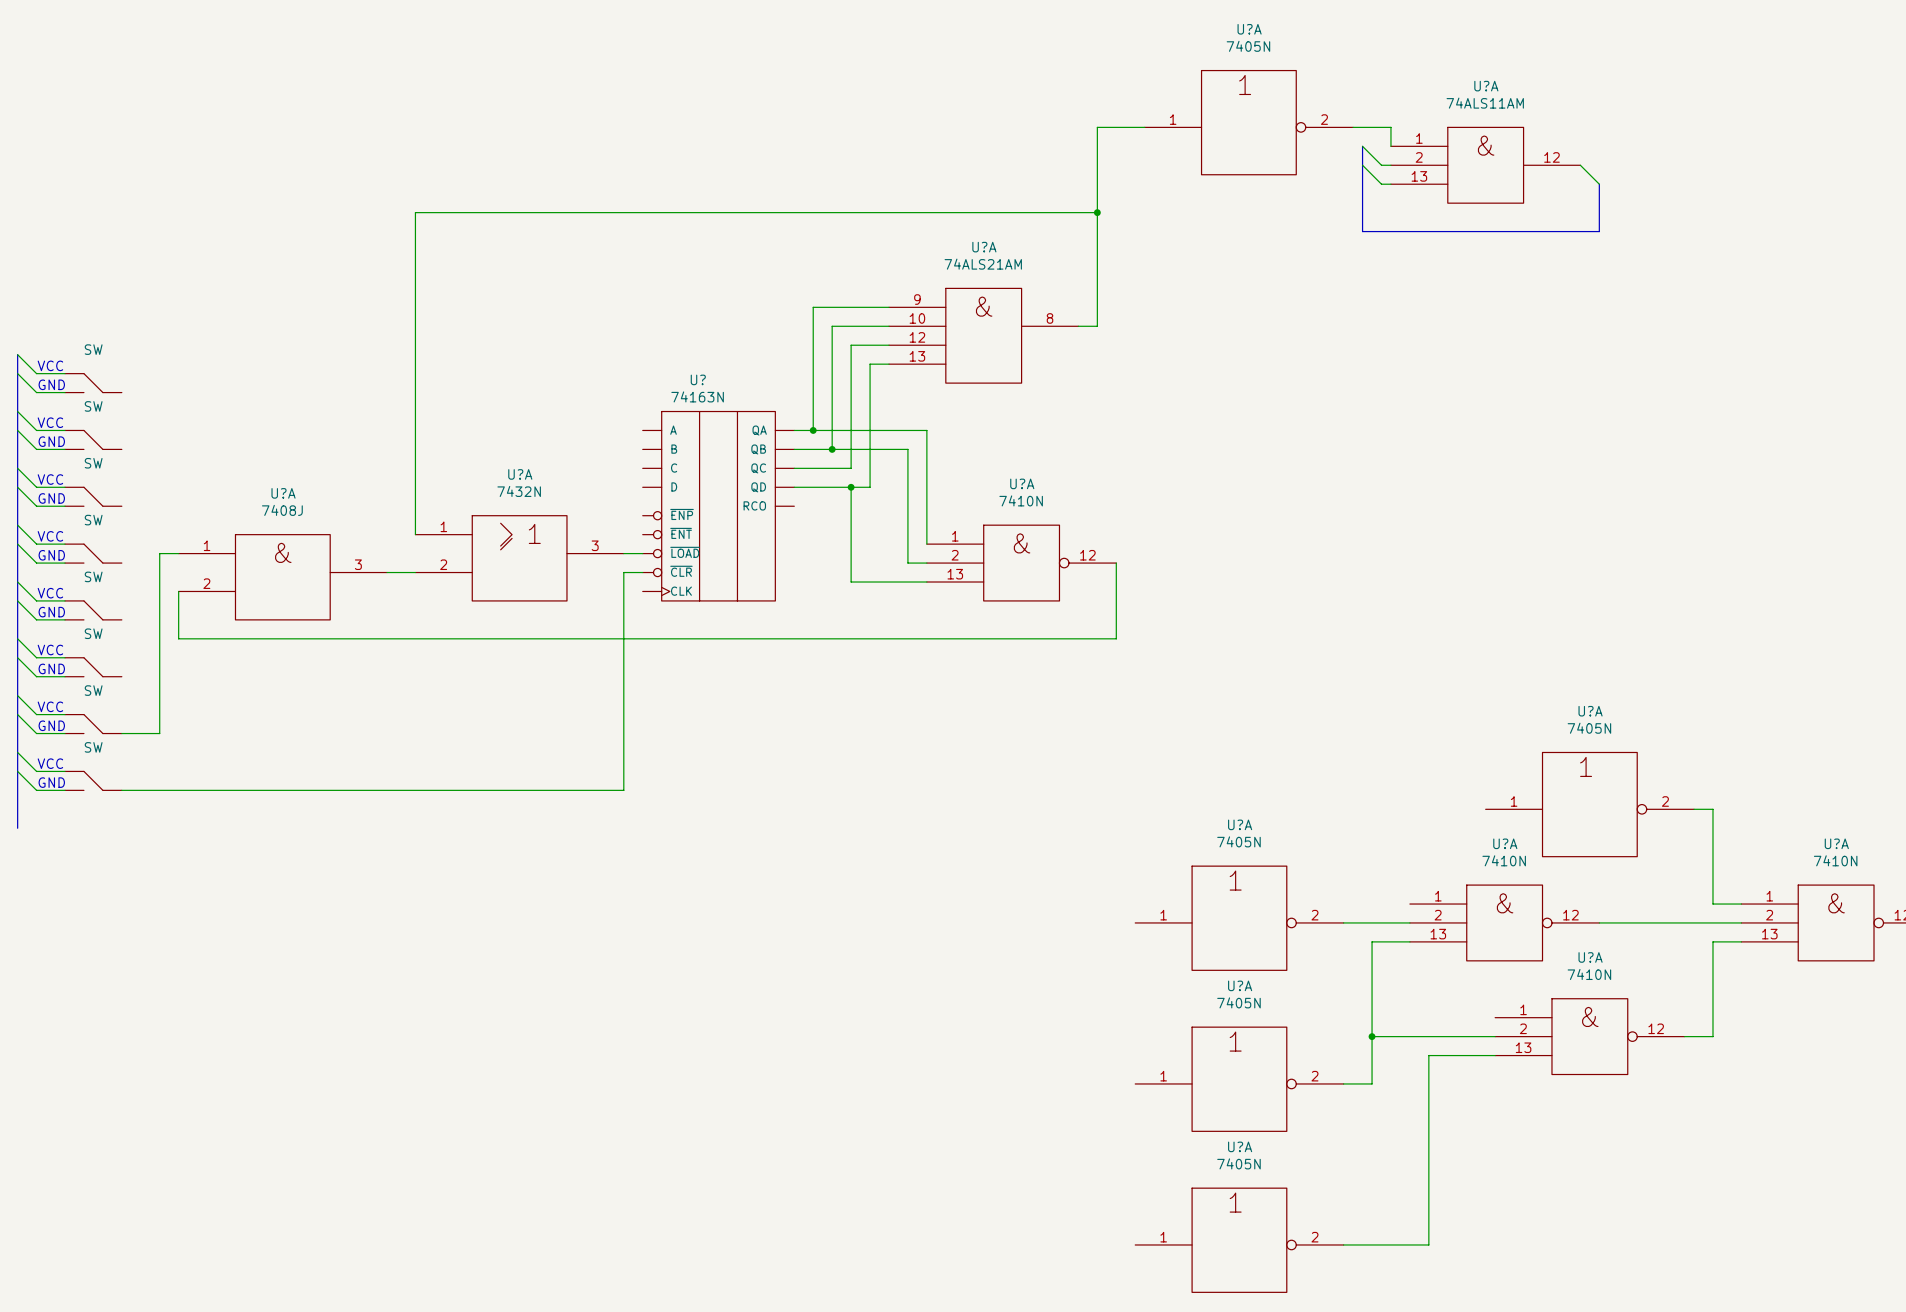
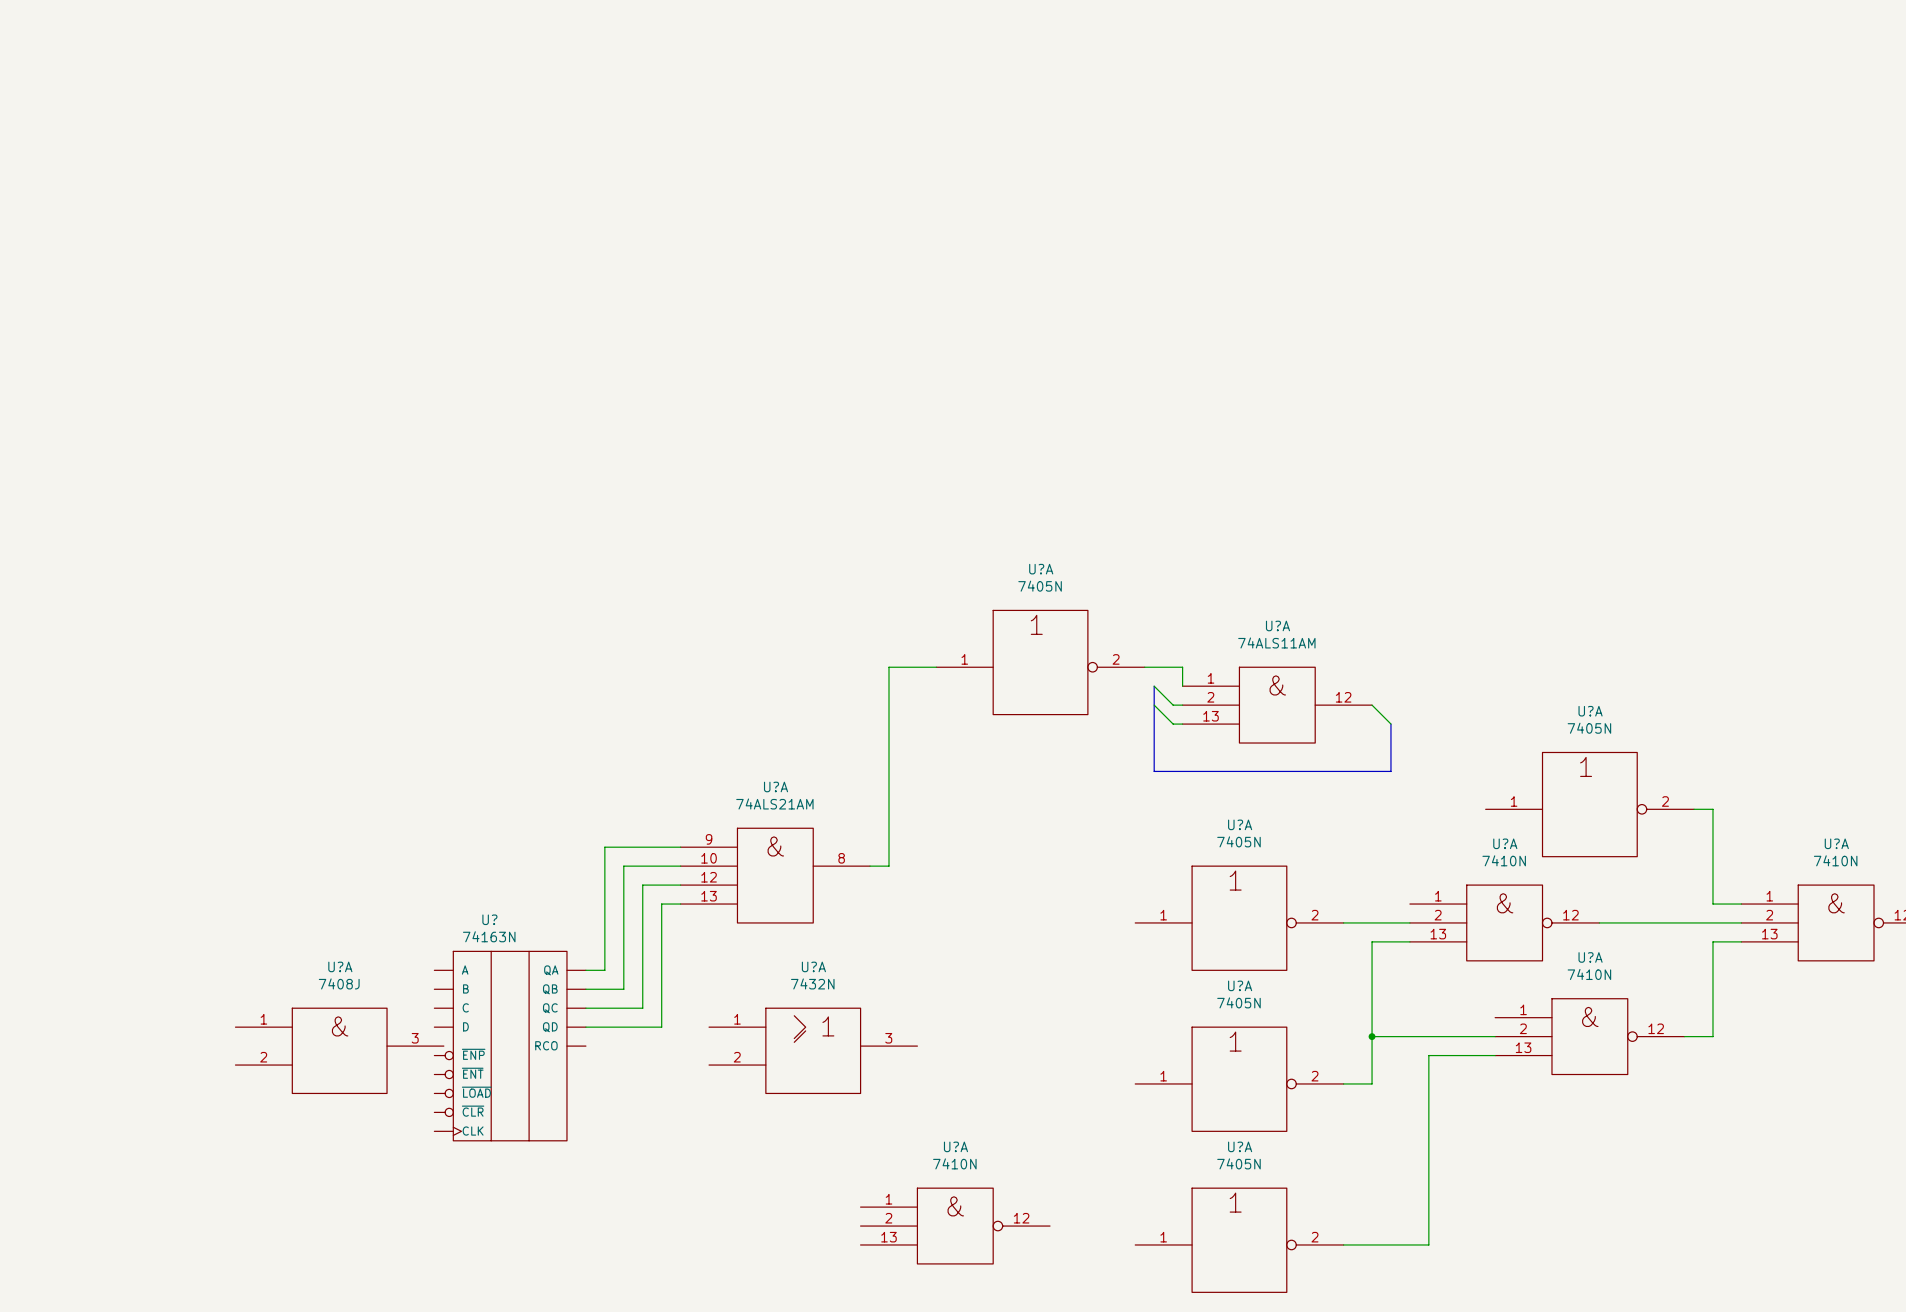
U?A: 7405N (1248, 122) -> none
wire: (1144, 127) (1097, 127) (1097, 326) (1078, 326) -> none
wire: (1353, 127) (1390, 127) (1390, 146) -> none
wire: (1362, 146) (1381, 165) (1390, 165) -> none
bus: (1362, 146) (1362, 231) (1599, 231) (1599, 184) -> none
wire: (1362, 165) (1381, 184) (1390, 184) -> none
U?A: 74ALS11AM (1485, 165) -> none
wire: (1580, 165) (1599, 184) -> none
wire: (1097, 212) (415, 212) (415, 534) -> none
junction: (1097, 212) -> none
wire: (889, 307) (813, 307) (813, 430) -> none
wire: (889, 326) (832, 326) (832, 449) -> none
U?A: 74ALS21AM (983, 335) -> none
wire: (889, 345) (851, 345) (851, 468) (794, 468) -> none
wire: (17, 354) (36, 373) (65, 373) -> none
bus: (17, 354) (17, 828) -> none
wire: (889, 364) (870, 364) (870, 487) (794, 487) -> none
text: VCC (50, 365) -> none
wire: (17, 373) (36, 392) (65, 392) -> none
part: SW (93, 383) -> none
text: GND (51, 384) -> none
wire: (17, 411) (36, 430) (65, 430) -> none
text: VCC (50, 422) -> none
wire: (17, 430) (36, 449) (65, 449) -> none
wire: (794, 430) (926, 430) (926, 544) -> none
junction: (813, 430) -> none
part: SW (93, 439) -> none
text: GND (51, 441) -> none
wire: (794, 449) (907, 449) (907, 563) (926, 563) -> none
junction: (832, 449) -> none
wire: (17, 468) (36, 487) (65, 487) -> none
text: VCC (50, 479) -> none
wire: (17, 487) (36, 506) (65, 506) -> none
wire: (851, 487) (851, 582) (926, 582) -> none
junction: (851, 487) -> none
part: SW (93, 496) -> none
text: GND (51, 498) -> none
U?: 74163N (718, 506) -> none
wire: (17, 525) (36, 544) (65, 544) -> none
text: VCC (50, 536) -> none
wire: (17, 544) (36, 563) (65, 563) -> none
part: SW (93, 553) -> none
wire: (178, 553) (159, 553) (159, 733) (121, 733) -> none
wire: (623, 553) (642, 553) -> none
text: GND (51, 555) -> none
U?A: 7432N (519, 558) -> none
U?A: 7410N (1021, 563) -> none
wire: (1116, 563) (1116, 638) (178, 638) (178, 591) -> none
wire: (387, 572) (415, 572) -> none
wire: (642, 572) (623, 572) (623, 790) (121, 790) -> none
U?A: 7408J (282, 577) -> none
wire: (17, 582) (36, 600) (65, 600) -> none
text: VCC (50, 593) -> none
wire: (17, 600) (36, 619) (65, 619) -> none
part: SW (93, 610) -> none
text: GND (51, 612) -> none
wire: (17, 638) (36, 657) (65, 657) -> none
text: VCC (50, 650) -> none
wire: (17, 657) (36, 676) (65, 676) -> none
U?A: none -> 7405N (1040, 662)
part: SW (93, 667) -> none
wire: none -> (936, 667) (889, 667) (889, 866) (870, 866)
wire: none -> (1144, 667) (1182, 667) (1182, 686)
text: GND (51, 668) -> none
wire: none -> (1154, 686) (1173, 705) (1182, 705)
bus: none -> (1154, 686) (1154, 771) (1390, 771) (1390, 724)
wire: (17, 695) (36, 714) (65, 714) -> none
wire: none -> (1154, 705) (1173, 724) (1182, 724)
U?A: none -> 74ALS11AM (1277, 705)
wire: none -> (1372, 705) (1390, 724)
text: VCC (50, 706) -> none
wire: (17, 714) (36, 733) (65, 733) -> none
part: SW (93, 724) -> none
text: GND (51, 725) -> none
wire: (17, 752) (36, 771) (65, 771) -> none
text: VCC (50, 763) -> none
wire: (17, 771) (36, 790) (65, 790) -> none
part: SW (93, 780) -> none
text: GND (51, 782) -> none
wire: none -> (680, 847) (604, 847) (604, 970) (585, 970)
wire: none -> (680, 866) (623, 866) (623, 989) (585, 989)
U?A: none -> 74ALS21AM (775, 875)
wire: none -> (680, 885) (642, 885) (642, 1008) (585, 1008)
wire: none -> (680, 904) (661, 904) (661, 1027) (585, 1027)
U?: none -> 74163N (510, 1046)
U?A: none -> 7408J (339, 1050)
U?A: none -> 7432N (813, 1050)
U?A: none -> 7410N (955, 1226)

